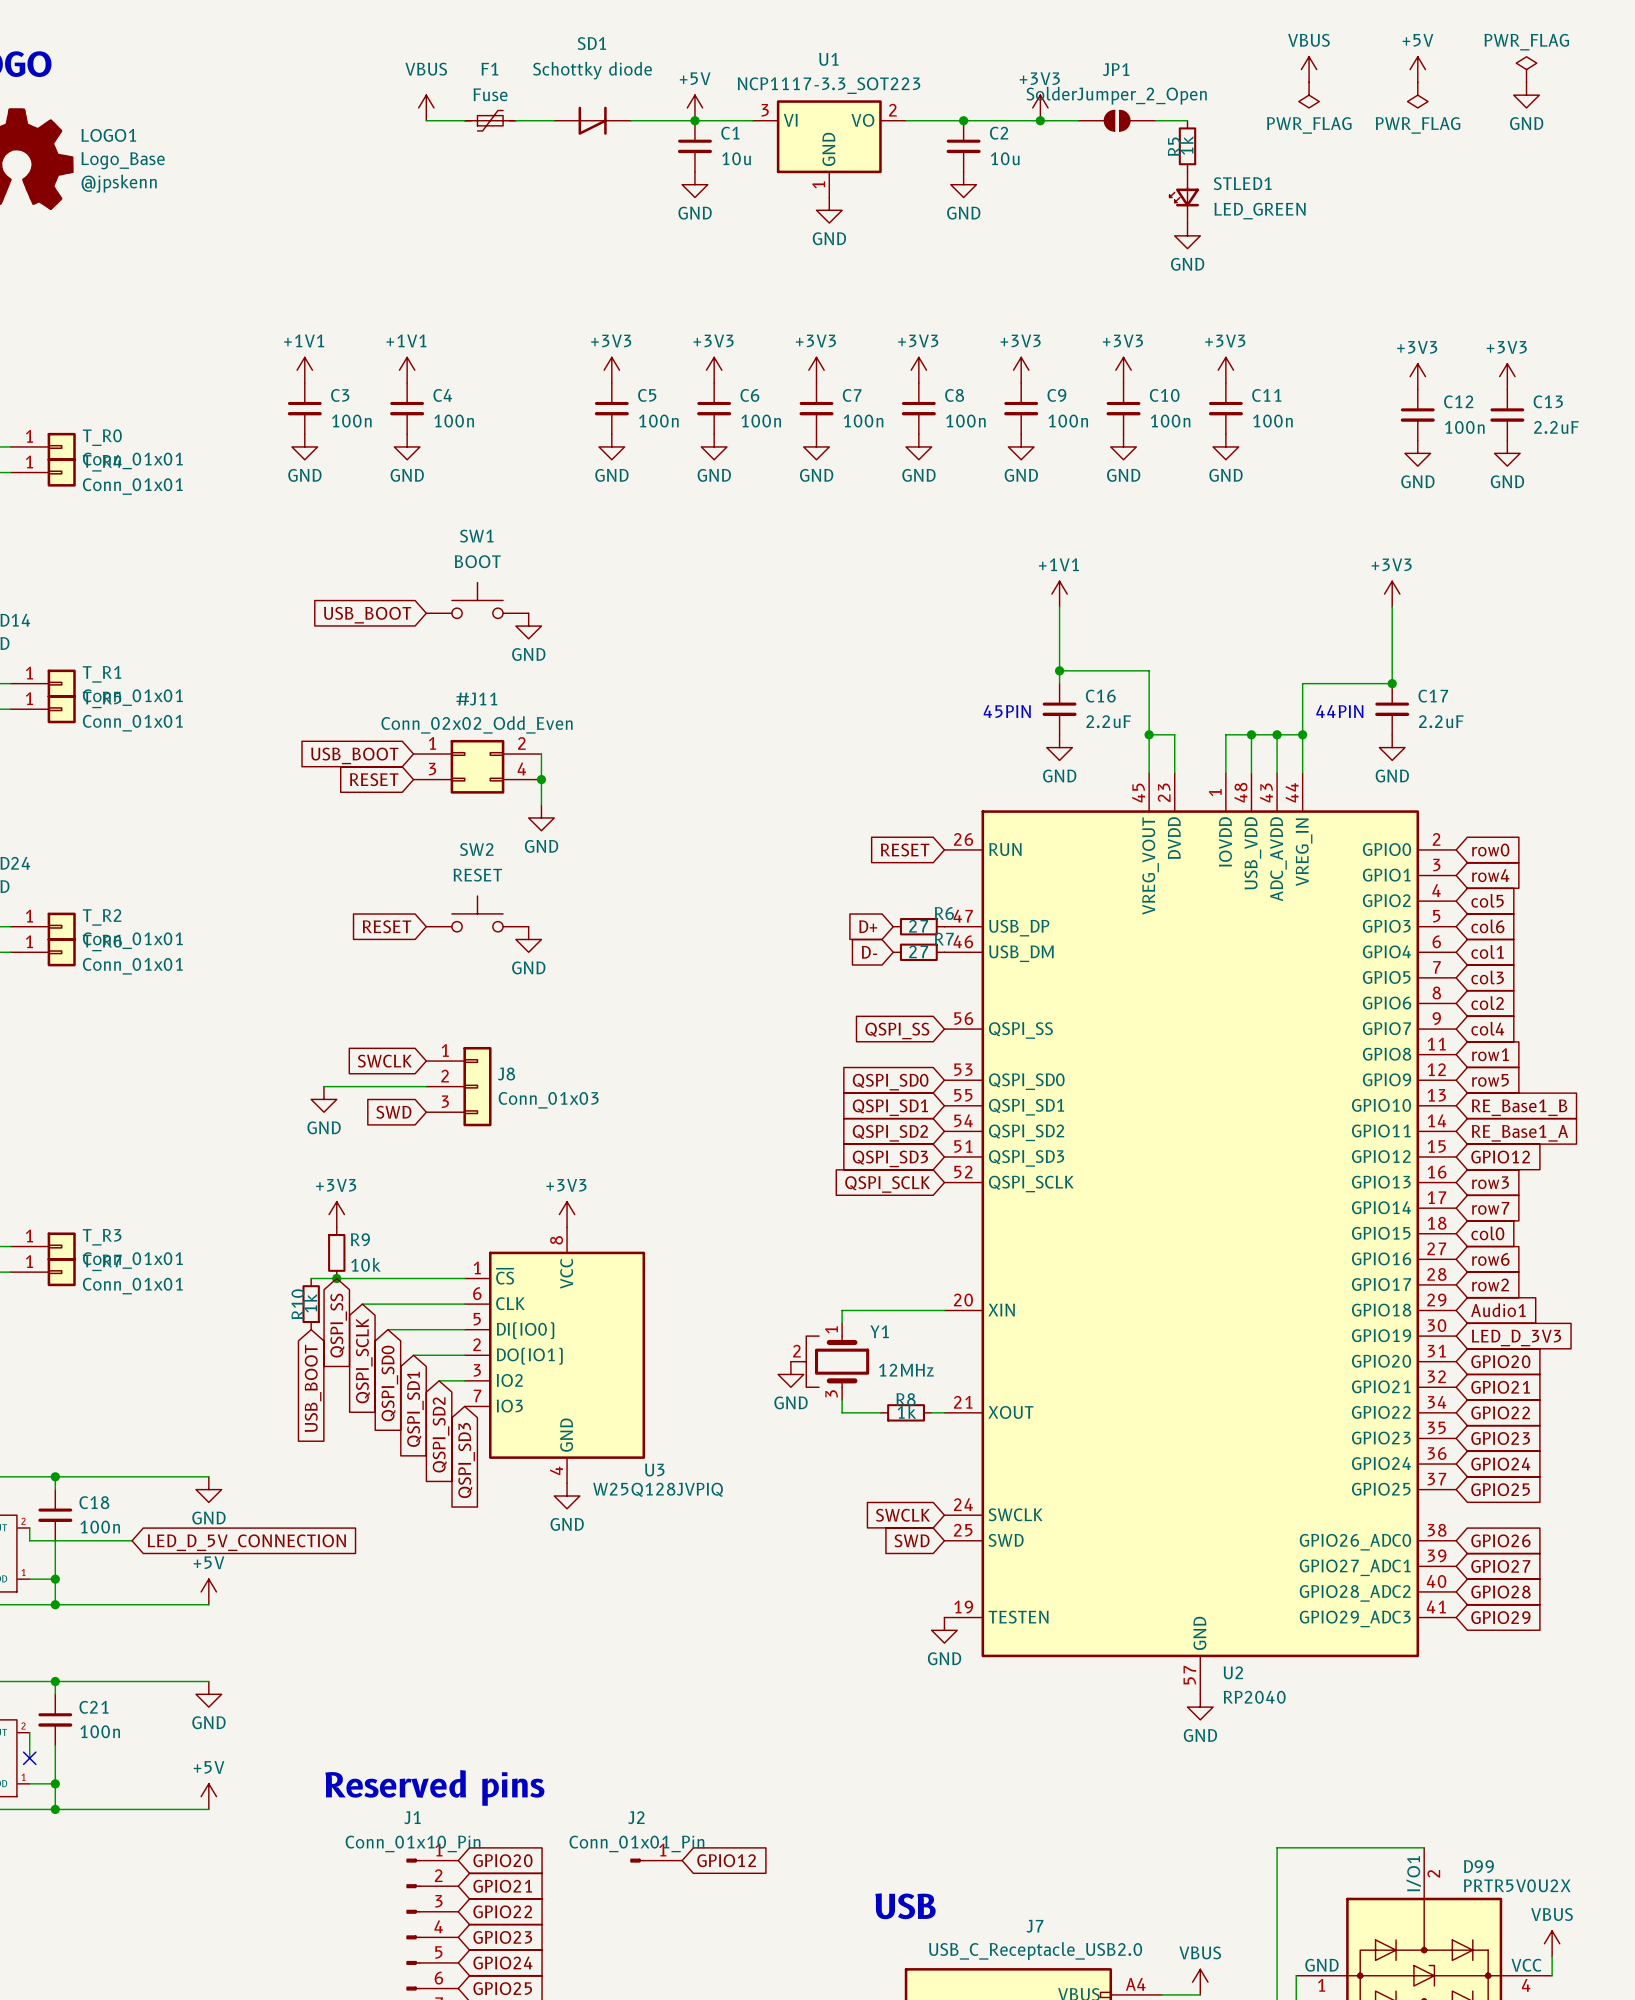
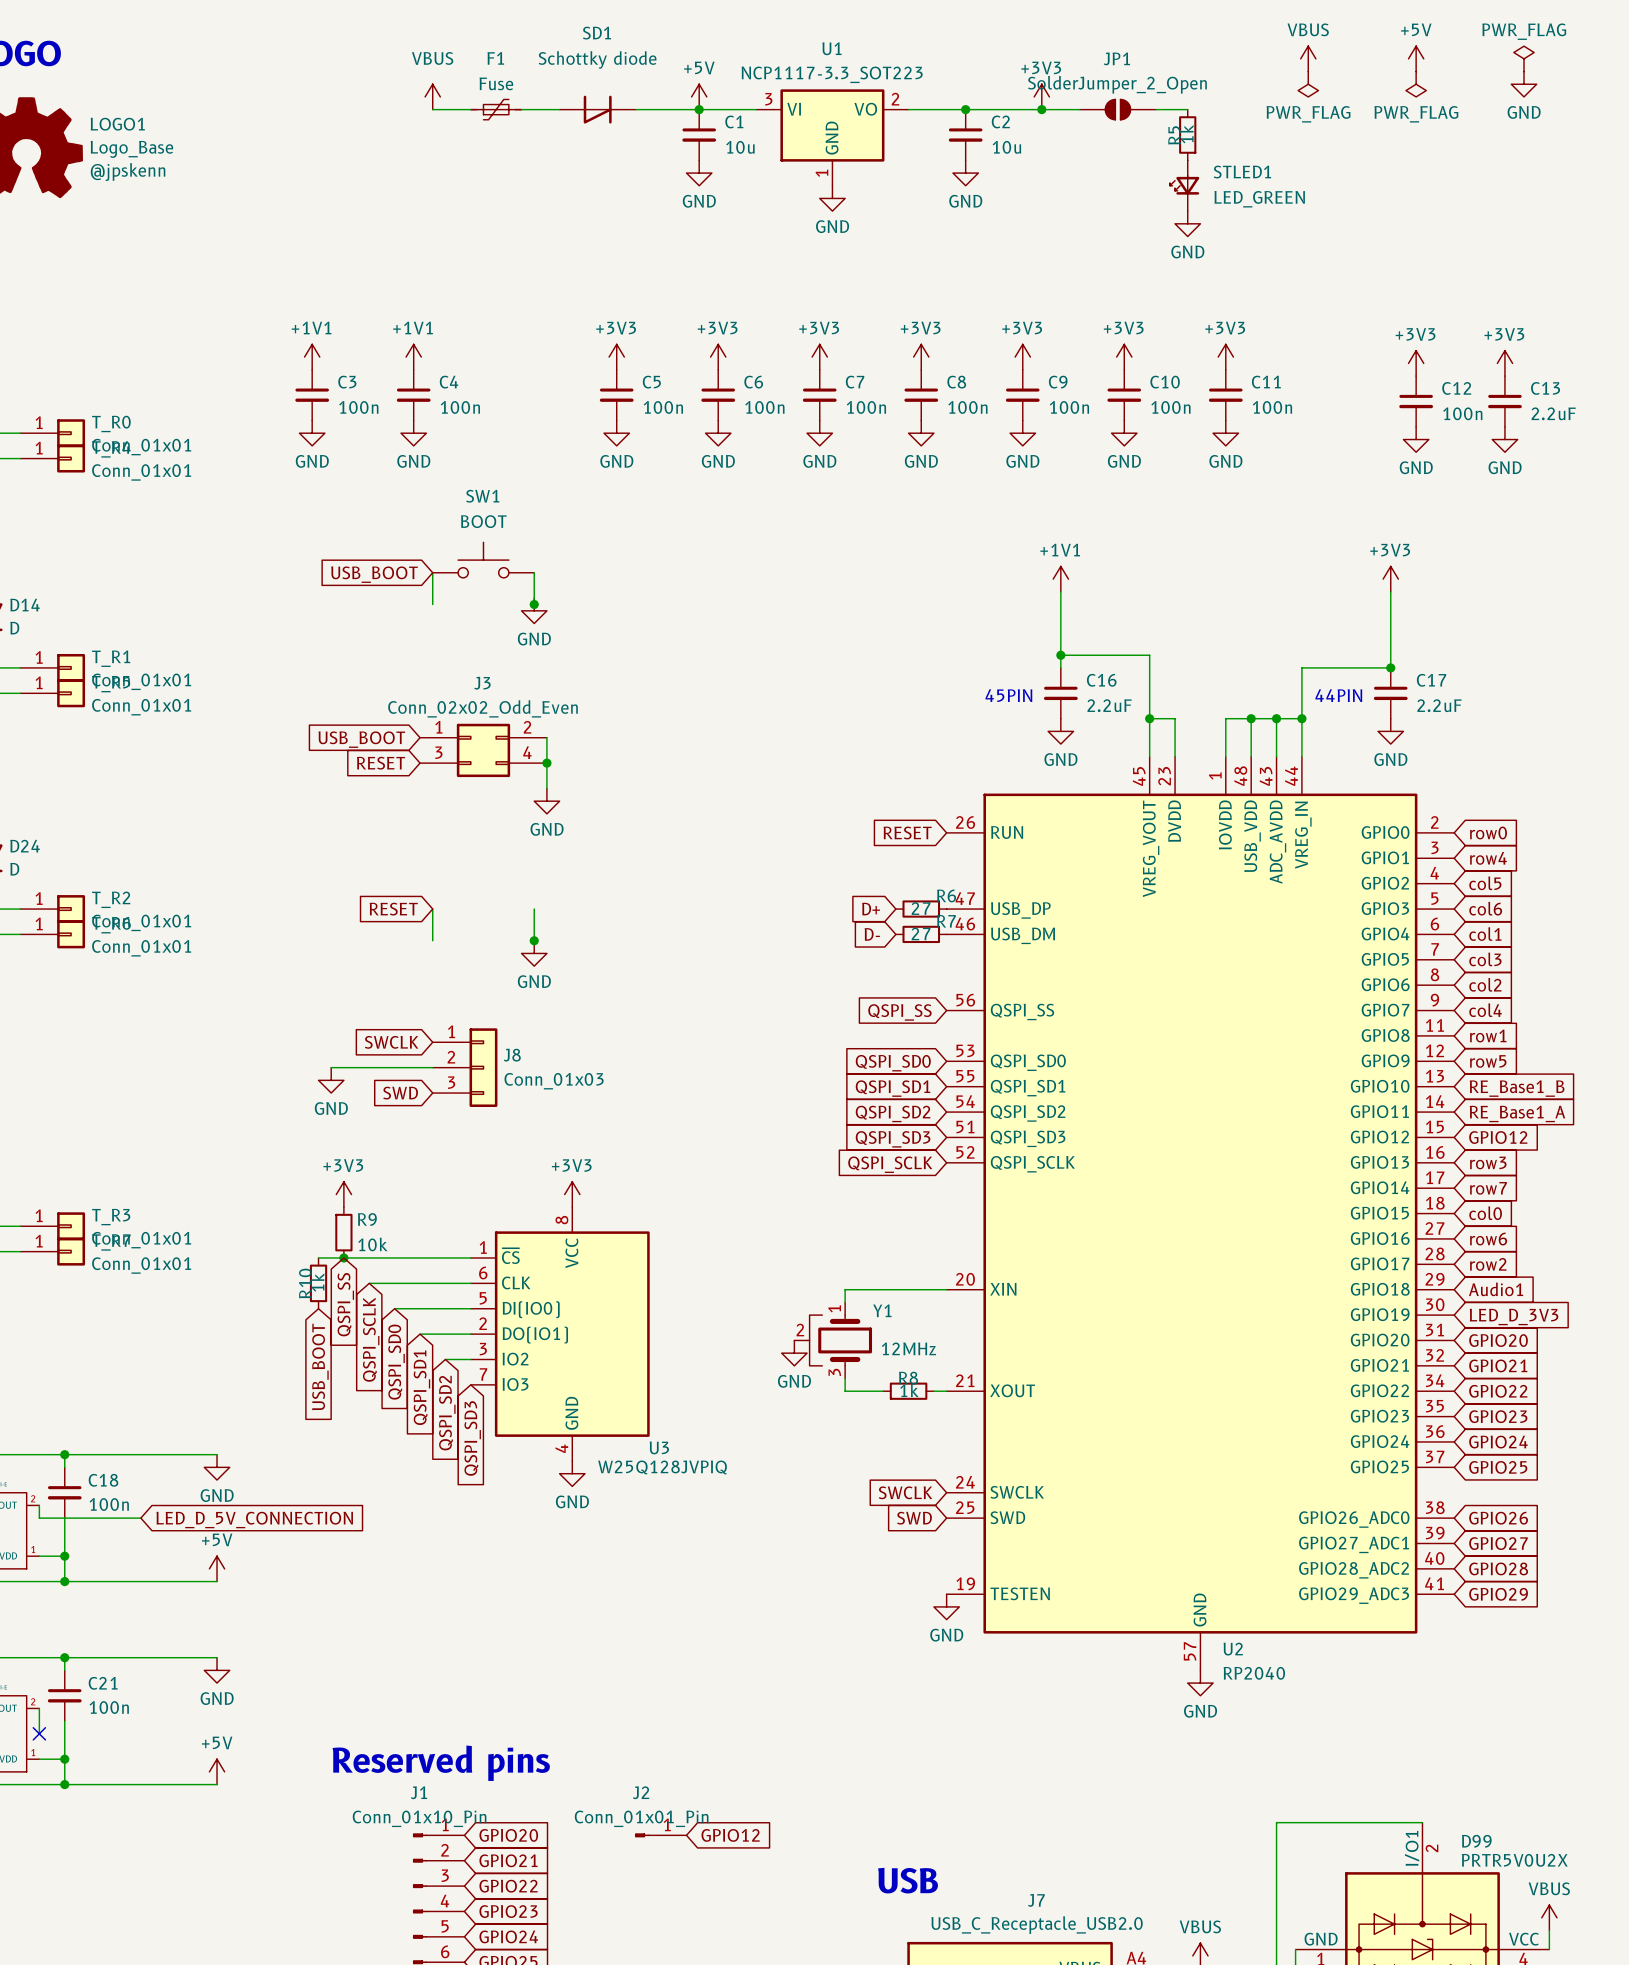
wire: none -> (432, 572) (432, 604)
wire: none -> (534, 572) (534, 604)
SW1 position: (477, 600) -> (483, 560)
global label position: USB_BOOT (367, 615) -> USB_BOOT (374, 574)
junction: none -> (534, 604)
#J11: Conn_02x02_Odd_Even (477, 766) -> none
J3: none -> Conn_02x02_Odd_Even (483, 750)
SW2: RESET (477, 913) -> none
wire: none -> (432, 909) (432, 940)
wire: none -> (534, 909) (534, 940)
power symbol position: GND (528, 939) -> GND (534, 953)
junction: none -> (534, 940)

